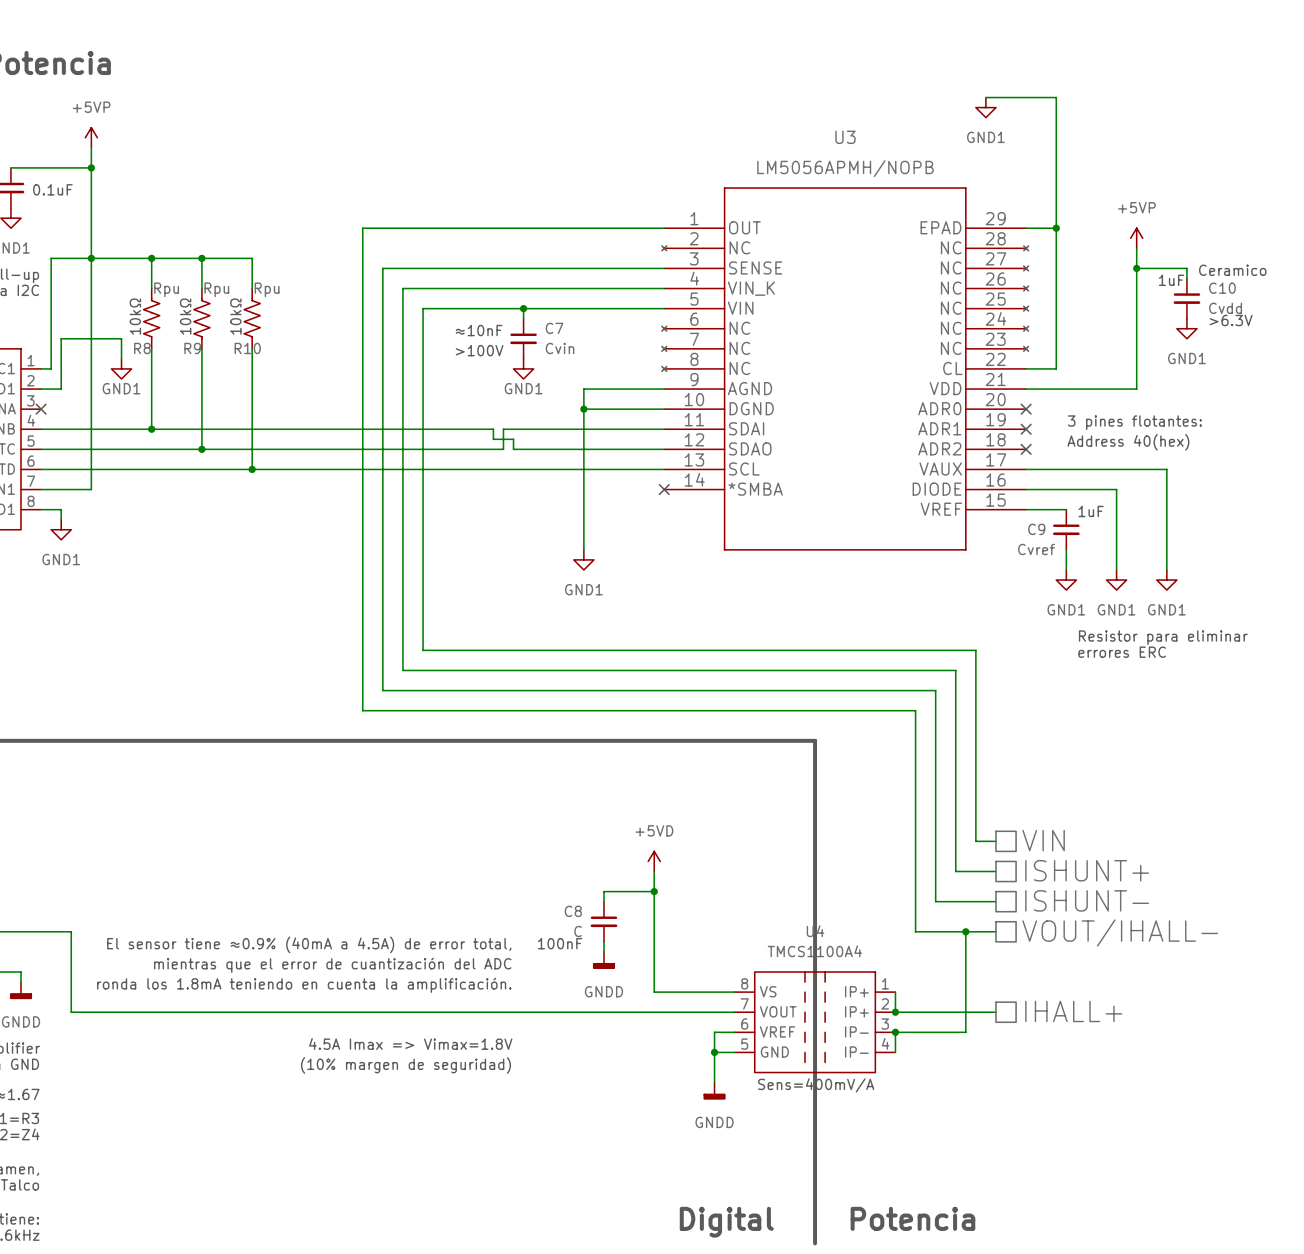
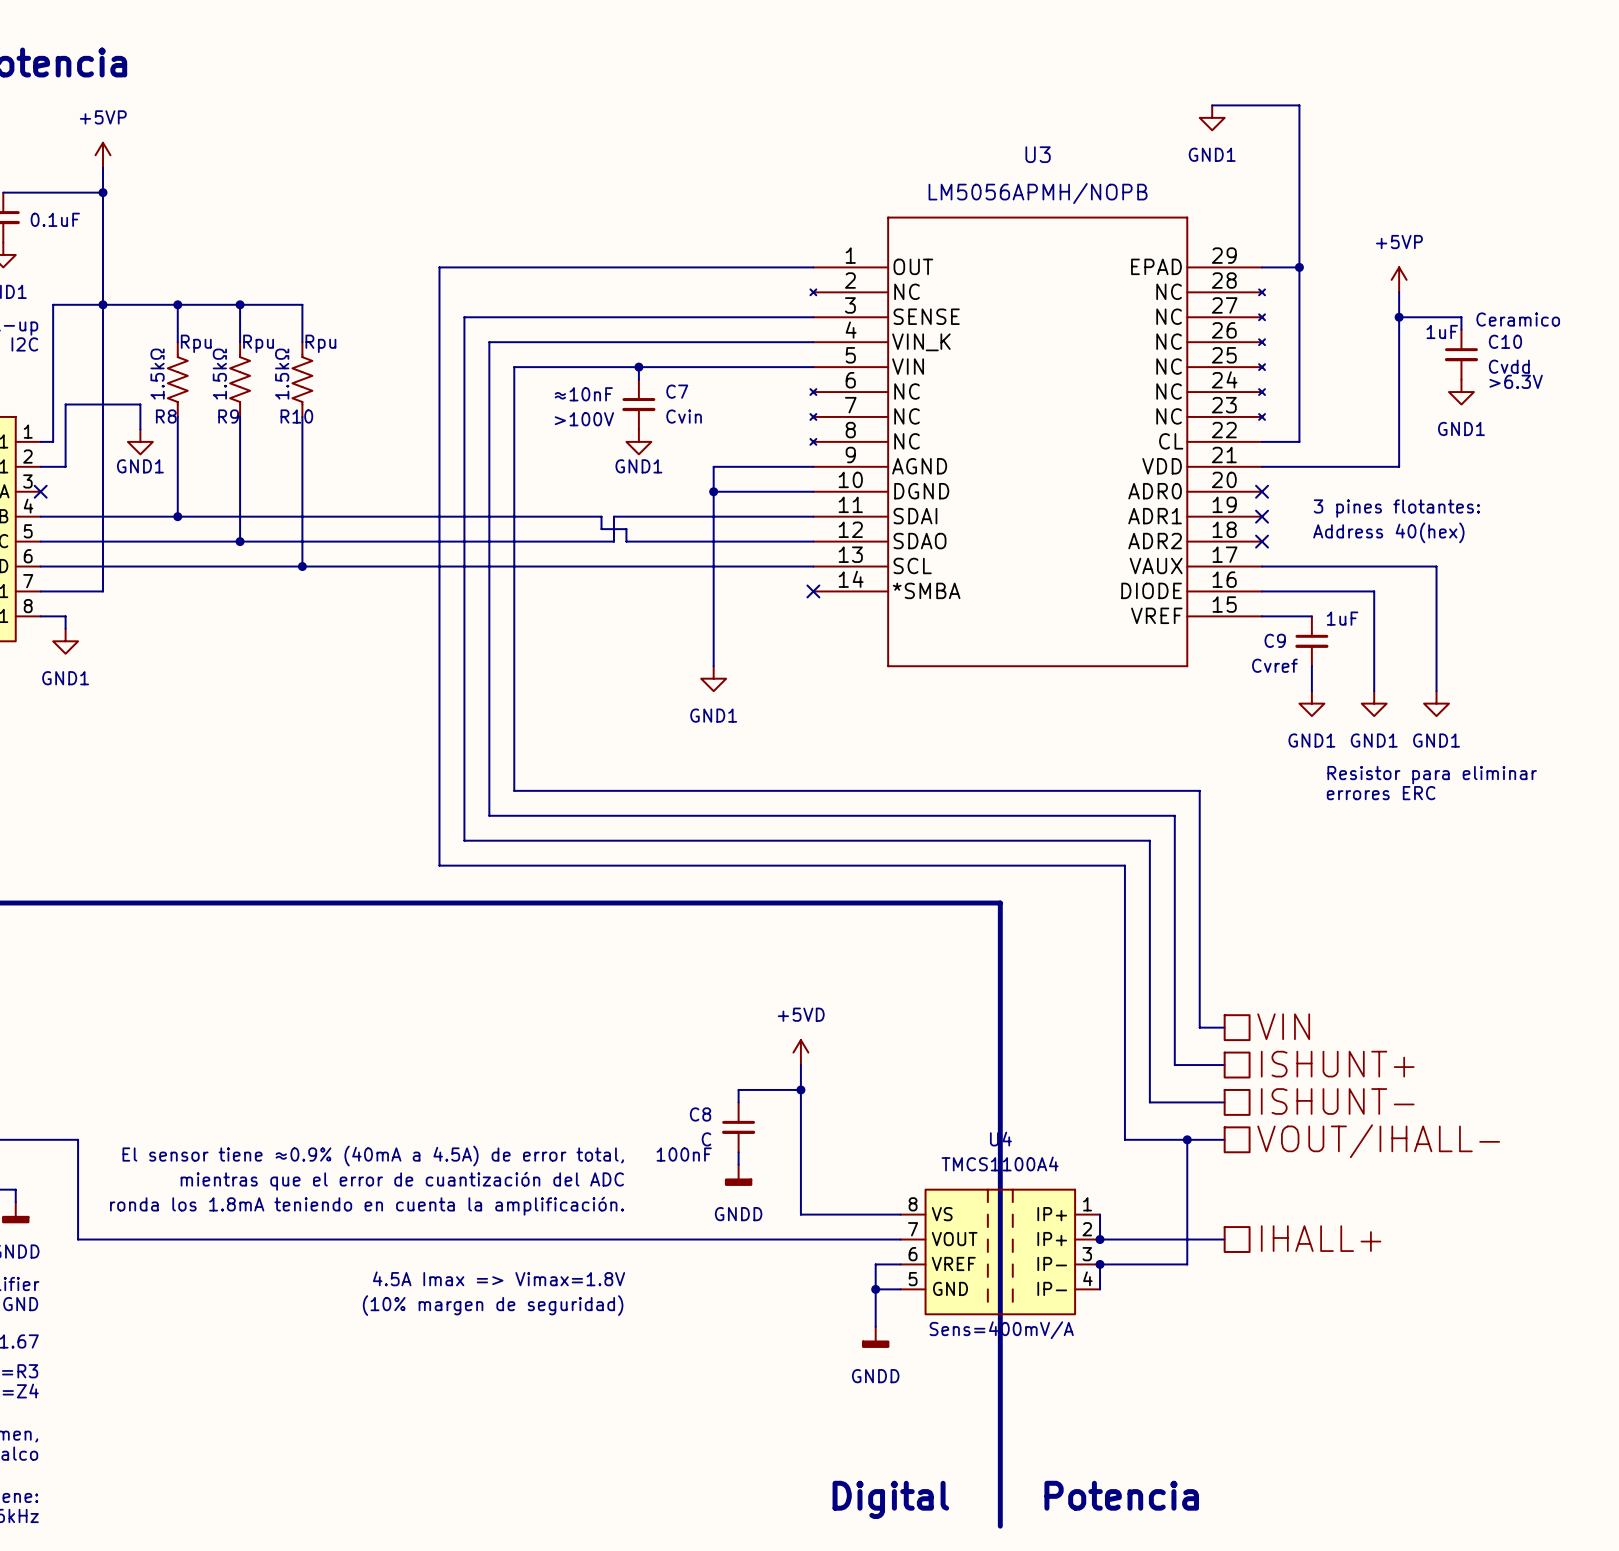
text: 10kΩ (135, 316) -> 1.5kΩ (157, 374)
text: 10kΩ (185, 316) -> 1.5kΩ (219, 374)
text: 10kΩ (235, 316) -> 1.5kΩ (282, 374)

